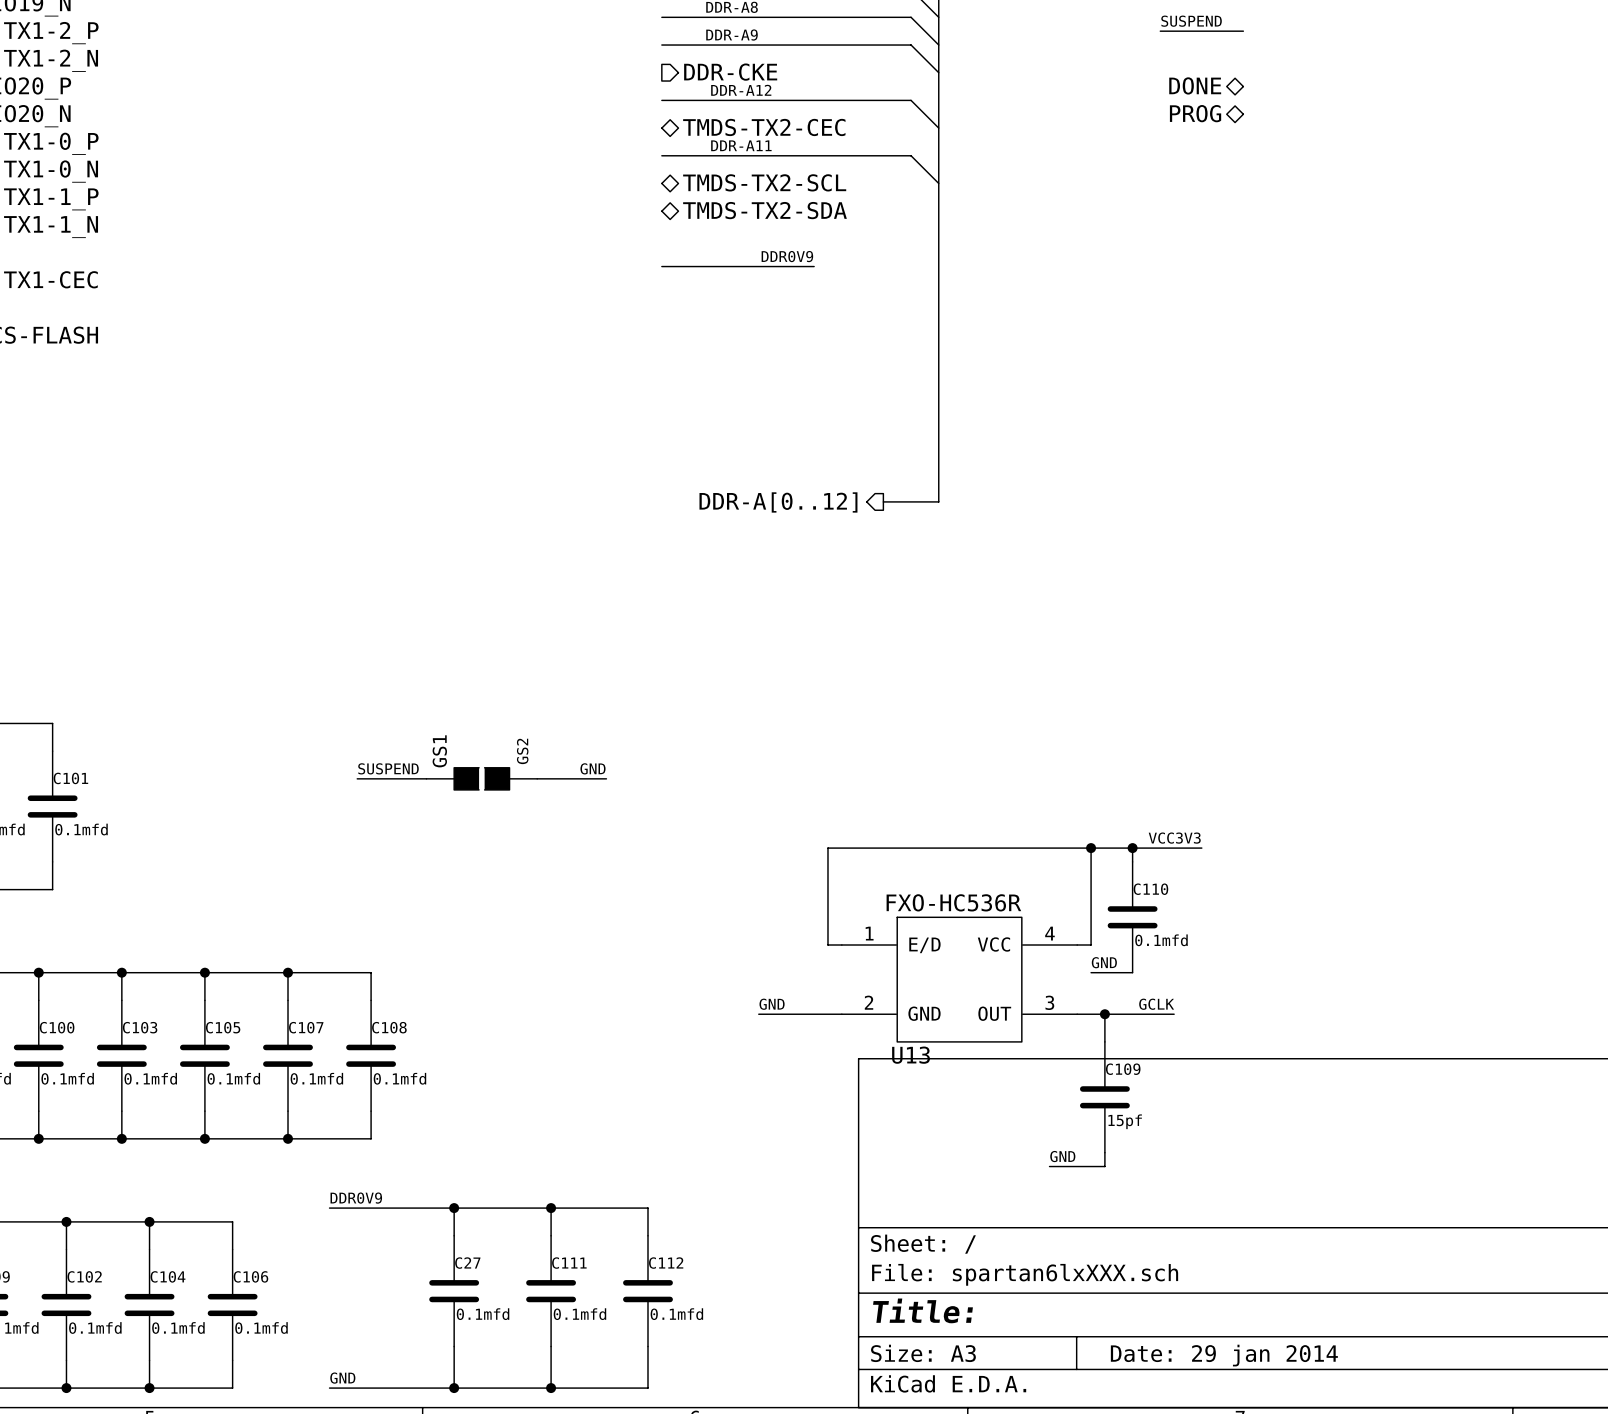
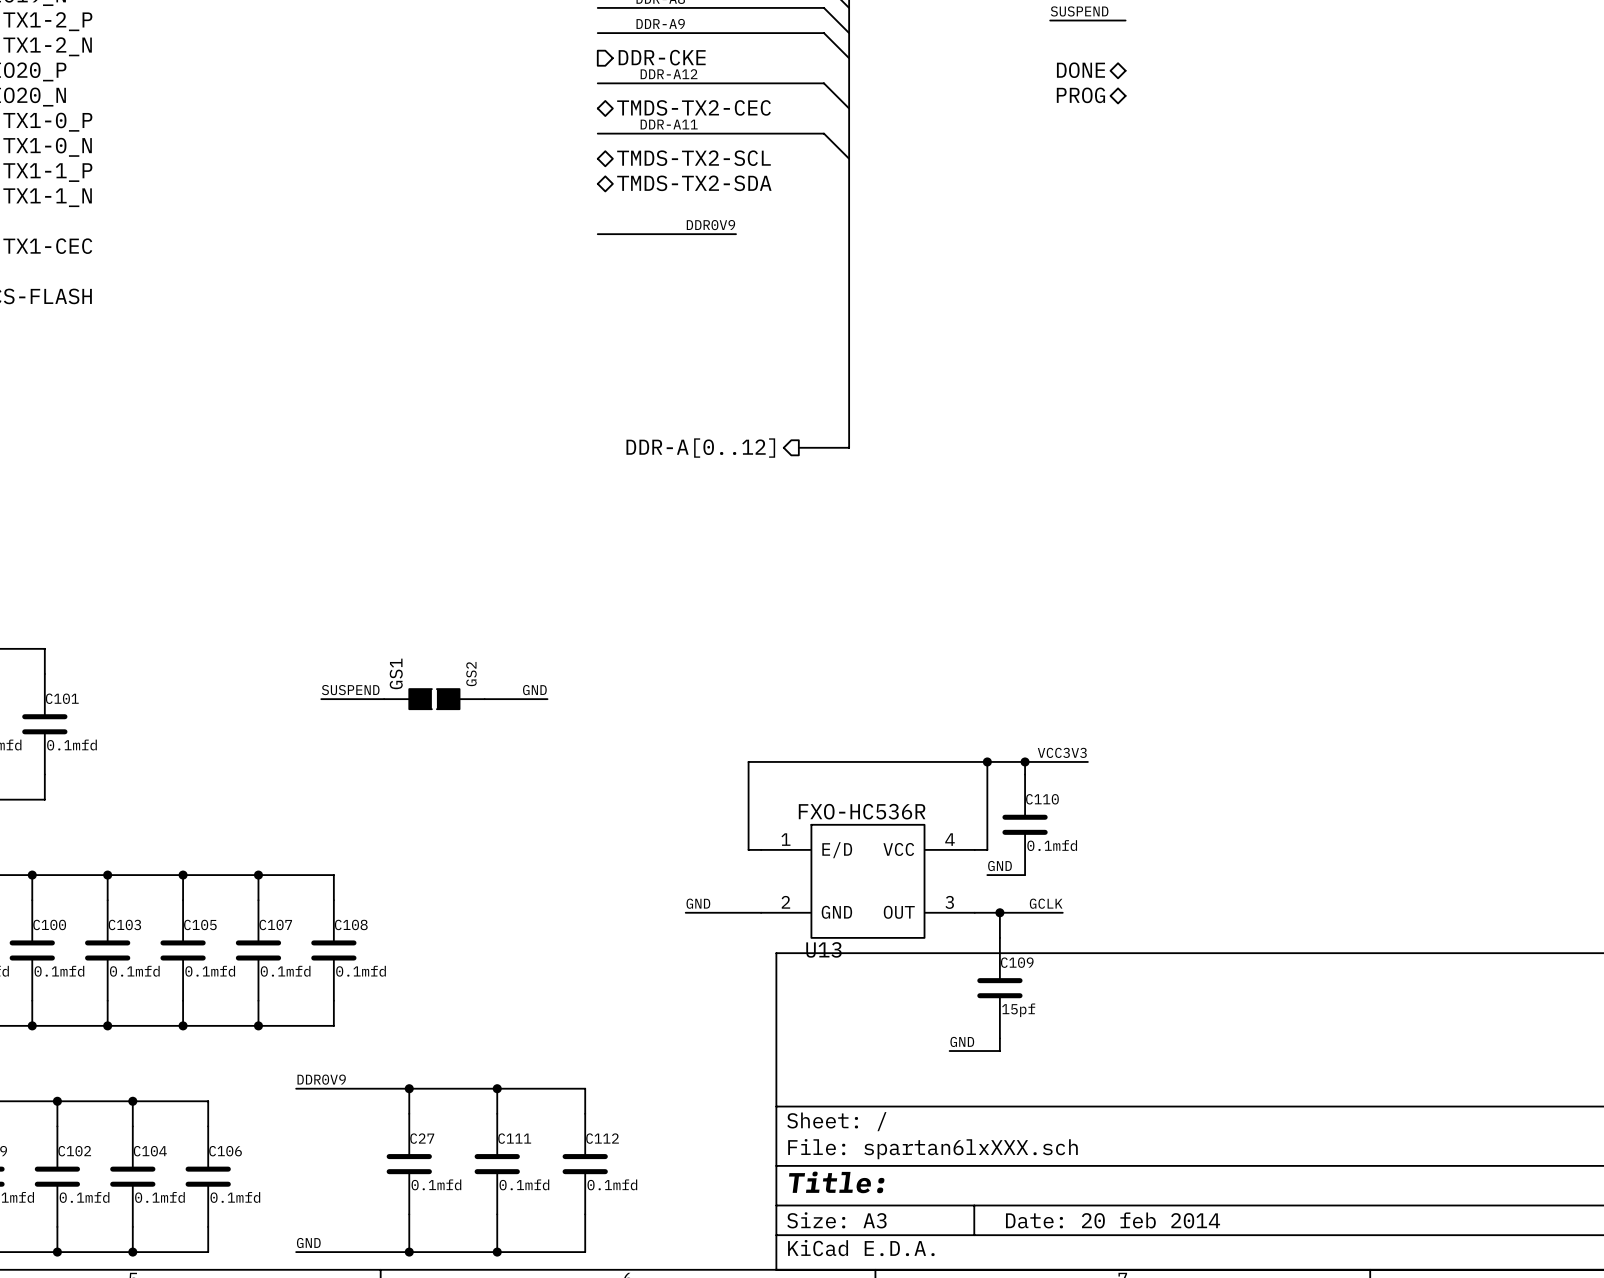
title block: Date: 29 jan 2014 (1224, 1355) -> Date: 20 feb 2014 (1113, 1220)

